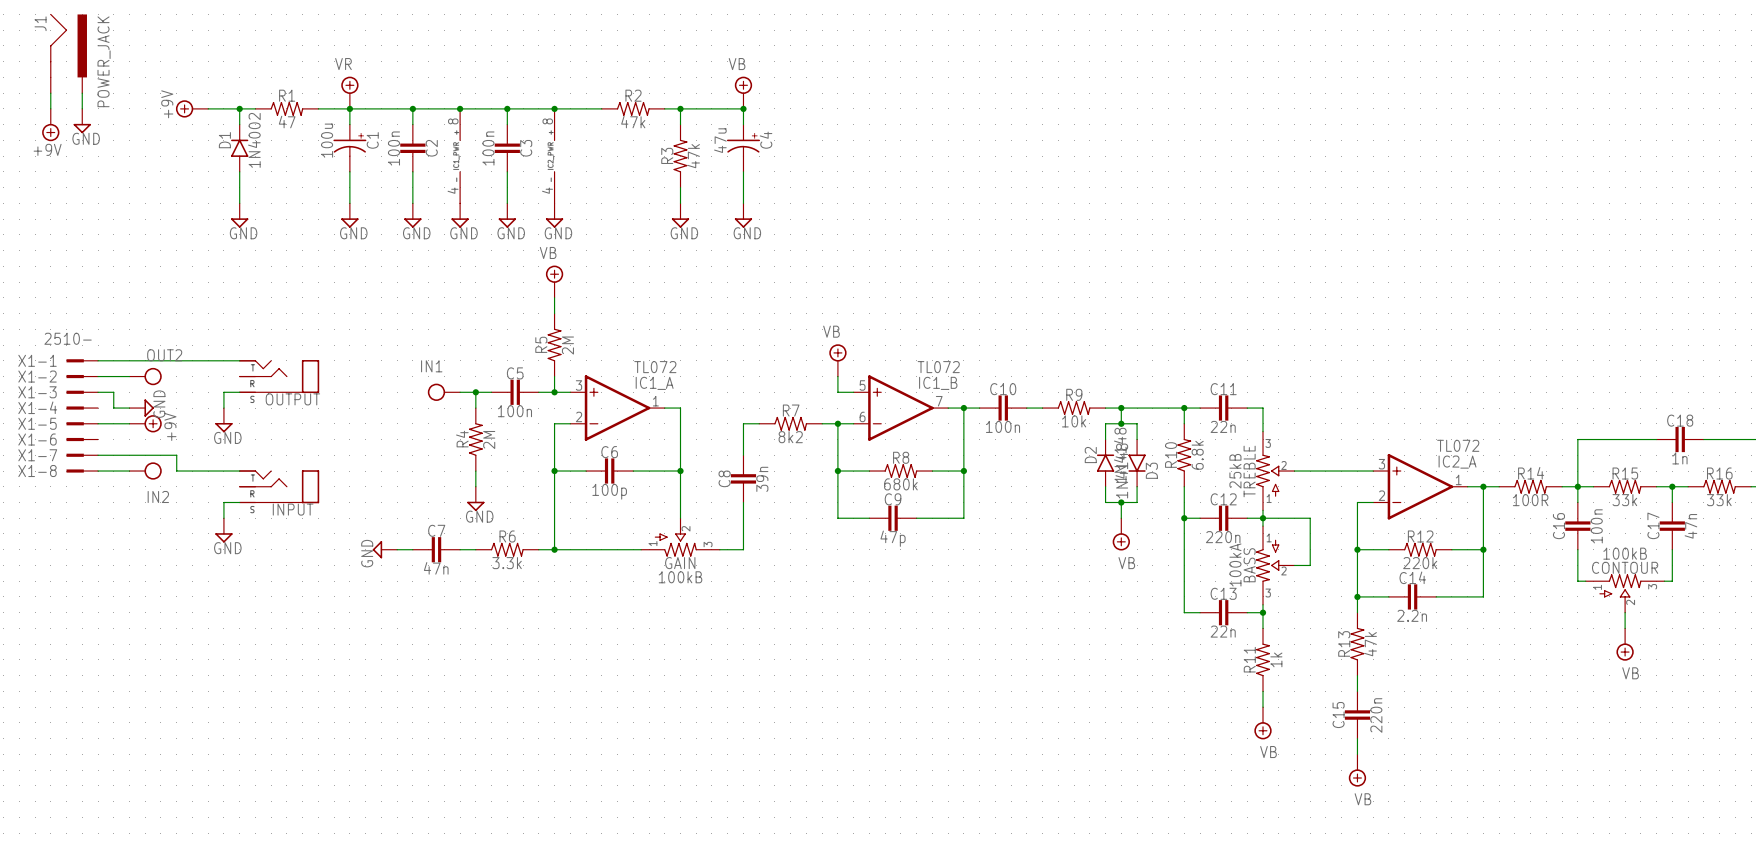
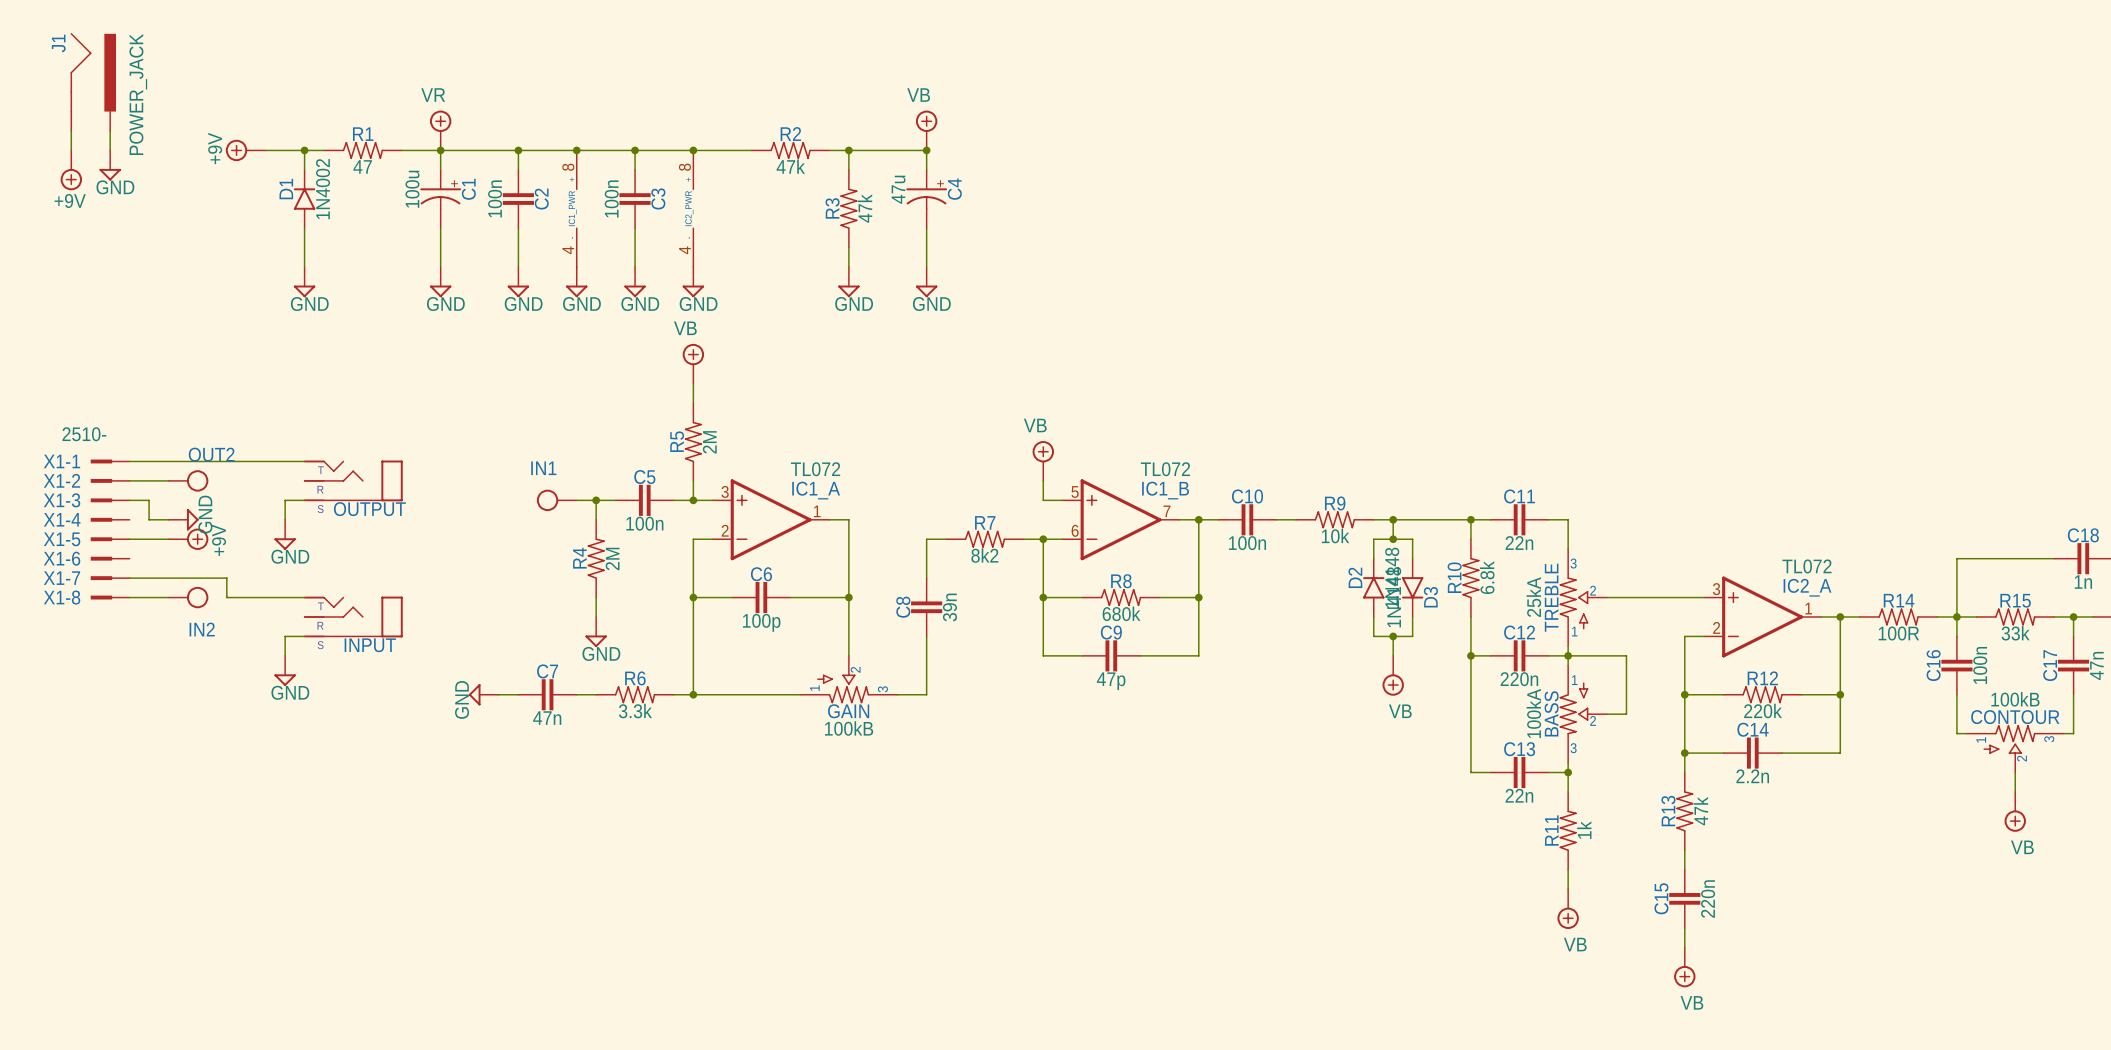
TREBLE value: 25kB (1235, 471) -> 25kA (1533, 597)

